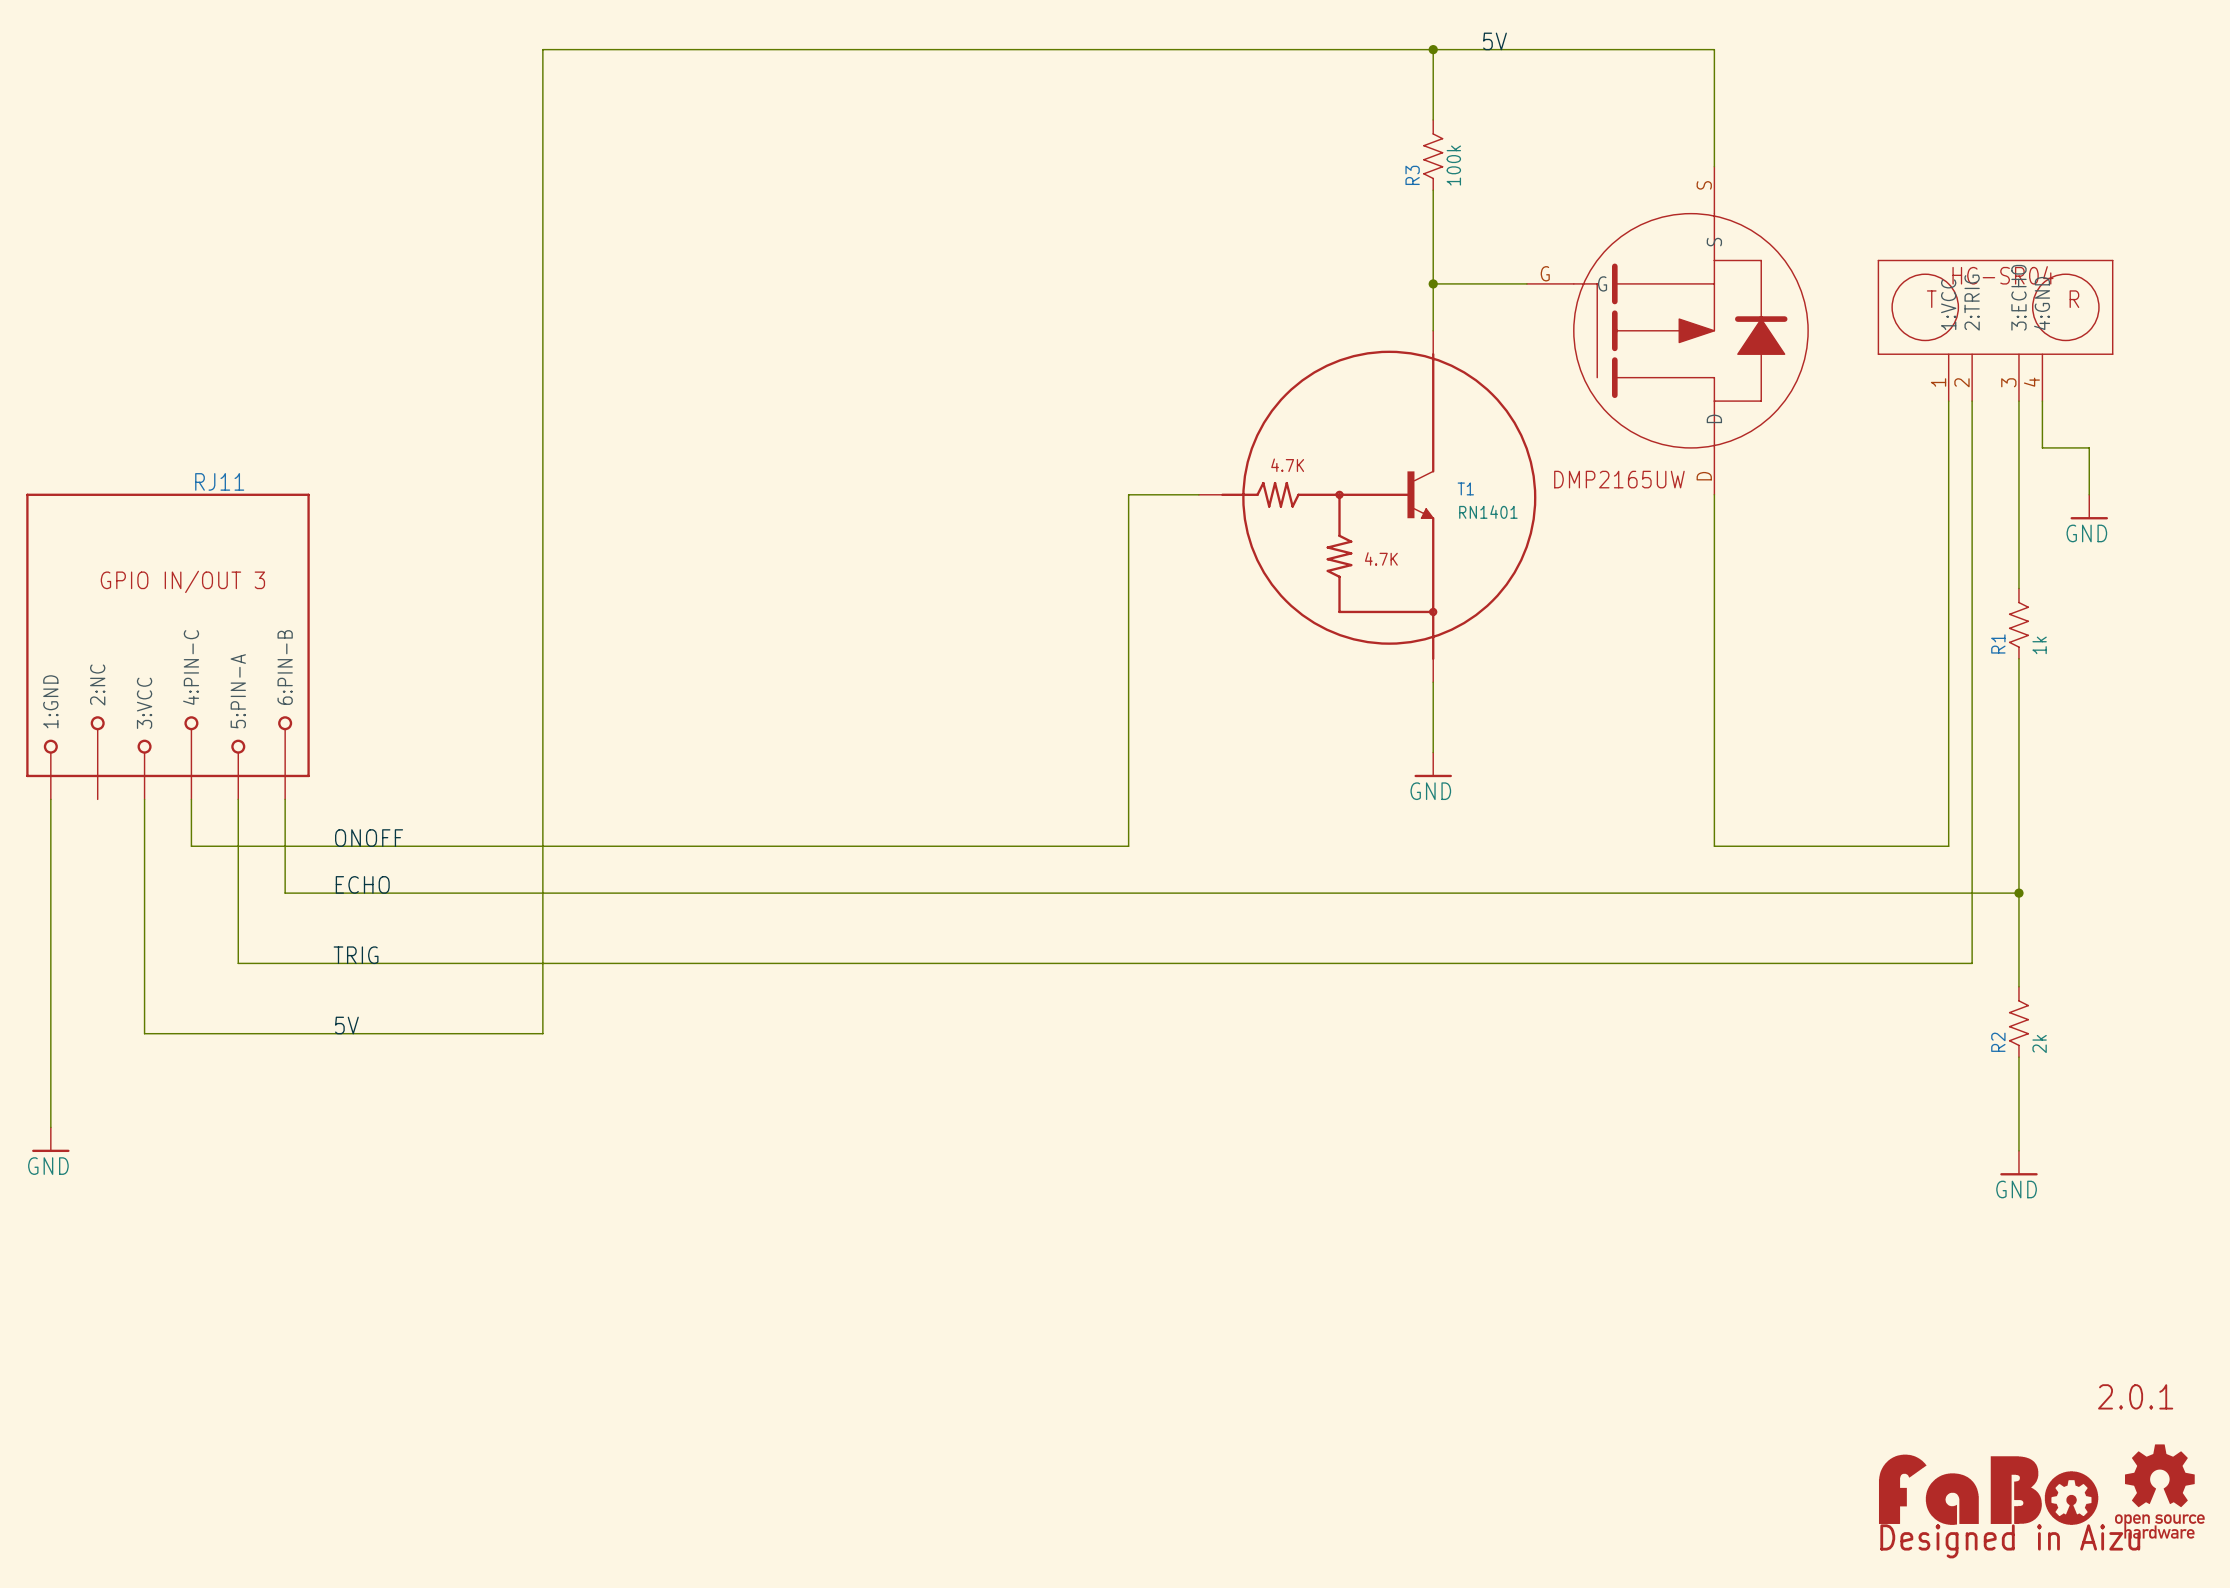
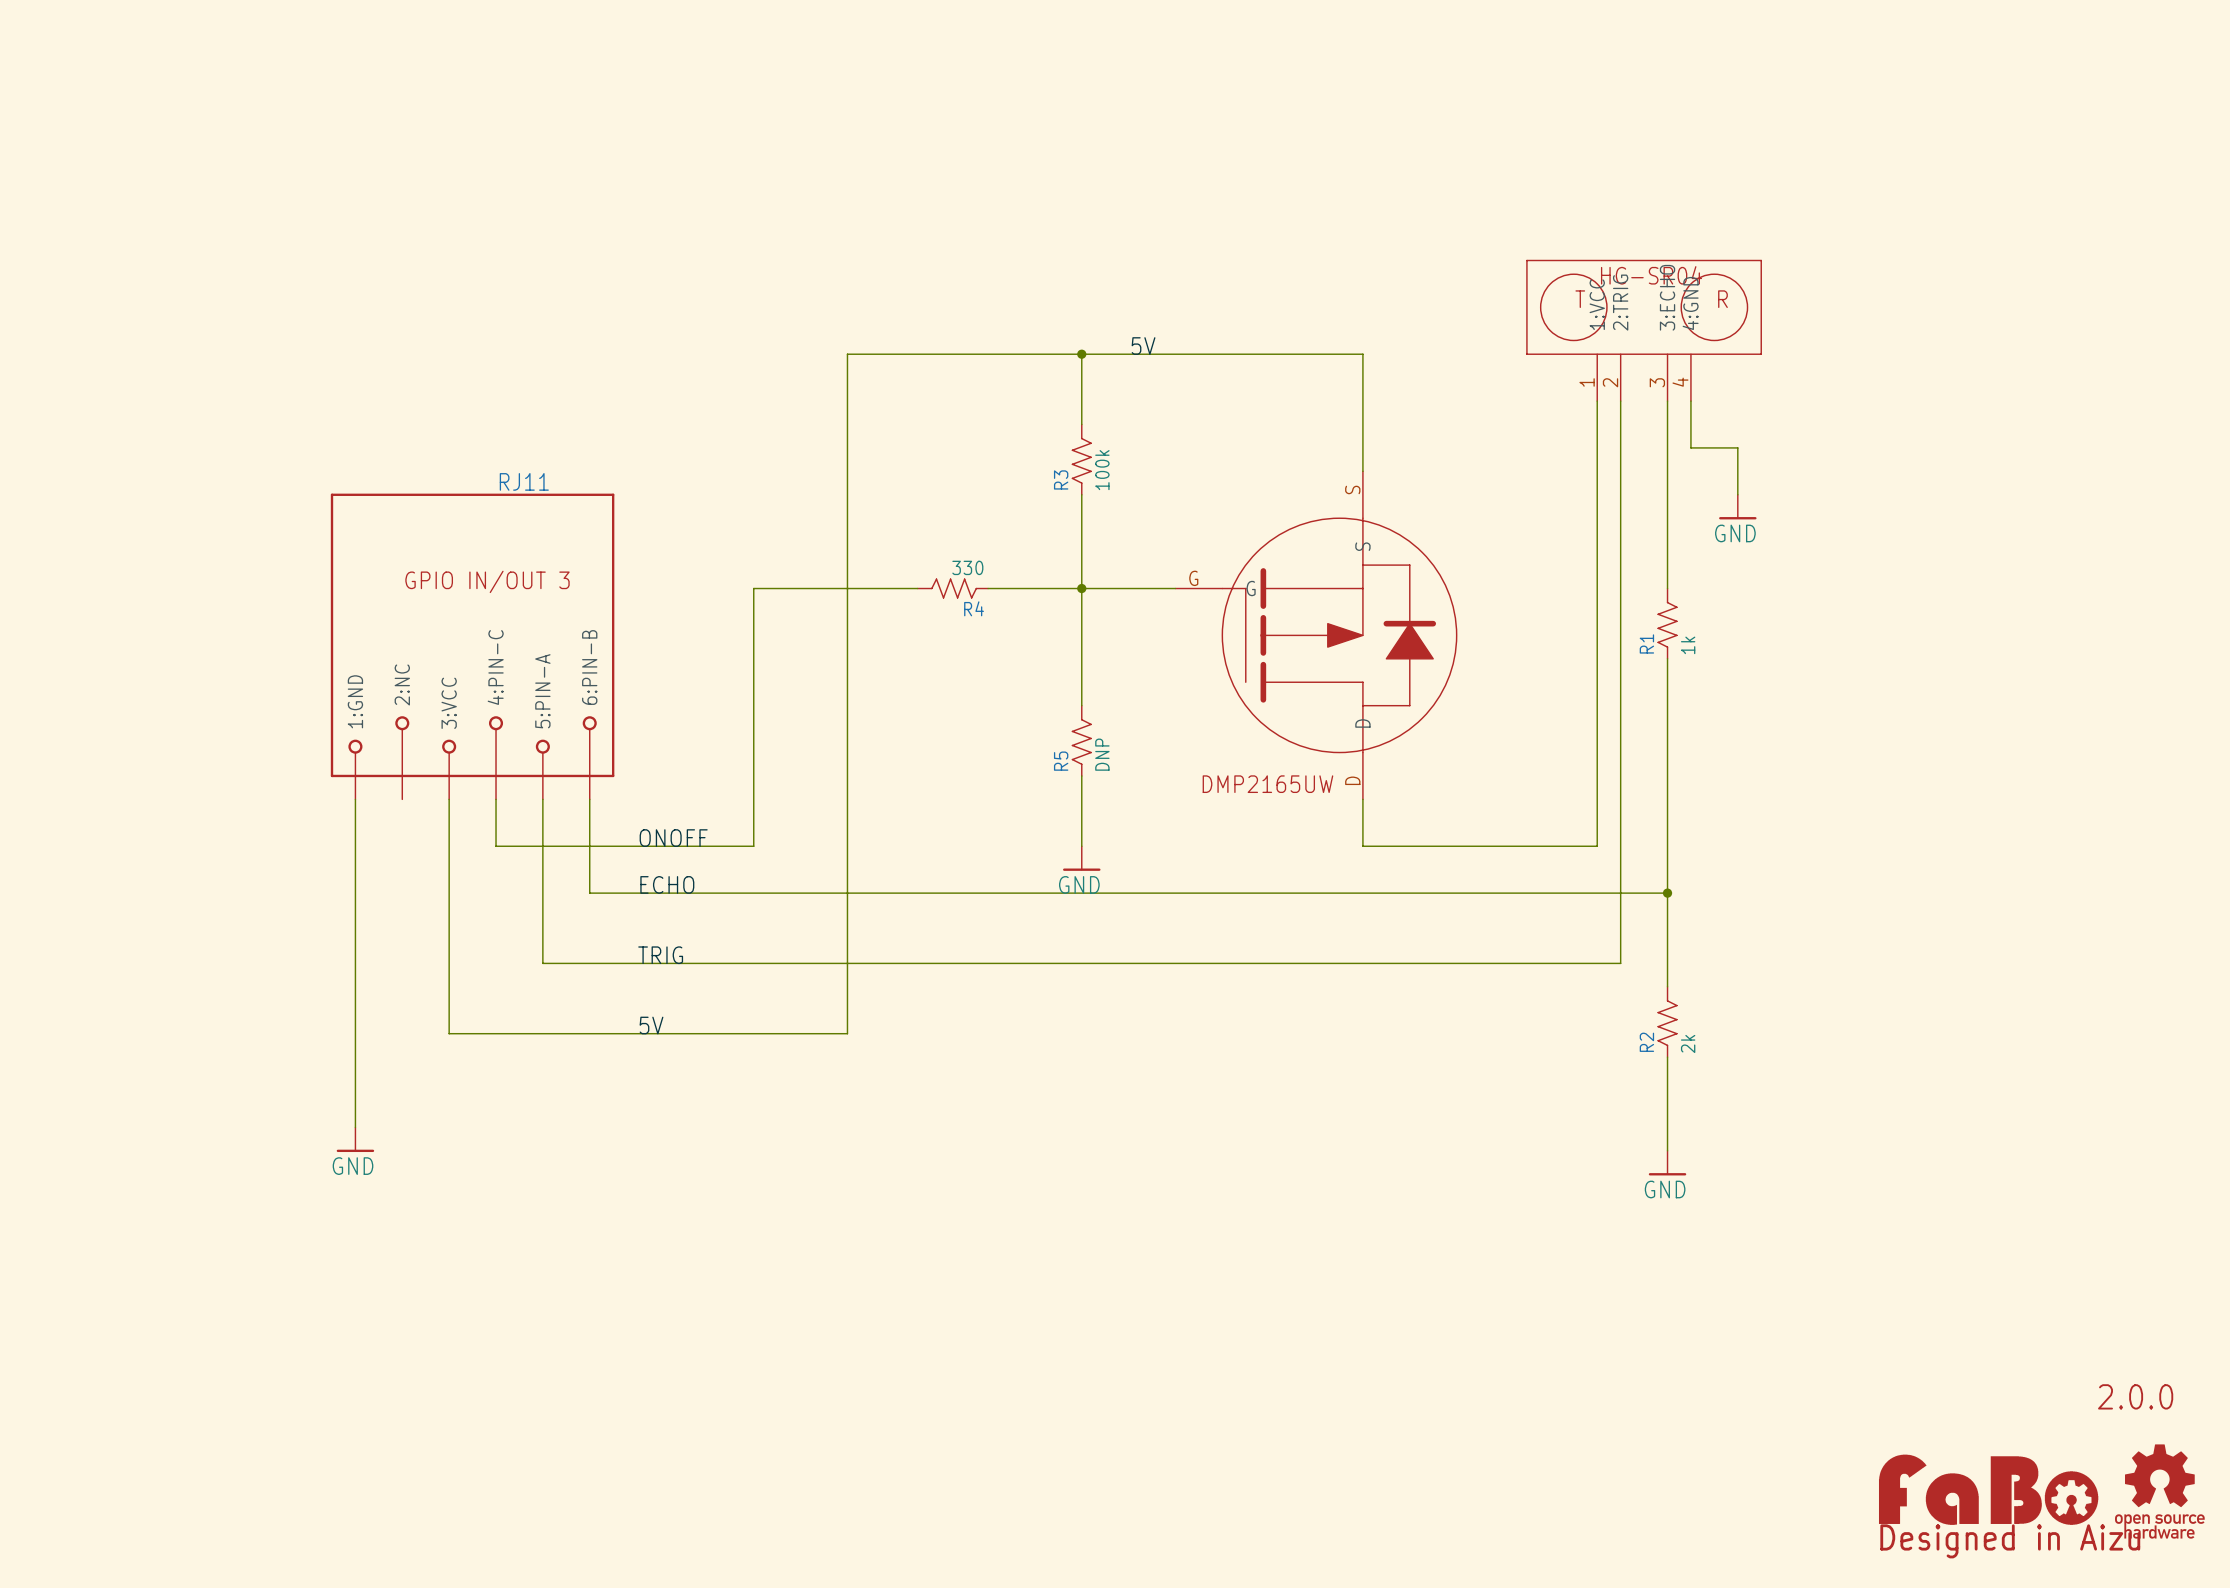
label: 5V (1495, 41) -> none
wire: (1433, 49) (1433, 119) -> none
junction: (1433, 49) -> none
R3 position: (1433, 155) -> (1081, 459)
wire: (1714, 166) (1714, 49) (542, 49) (542, 799) -> none
wire: (1433, 190) (1433, 330) -> none
wire: (1433, 283) (1526, 283) -> none
junction: (1433, 283) -> none
part: none -> (1644, 330)
part: (1667, 330) -> none
part: (1995, 330) -> none
label: none -> 5V (1143, 346)
wire: none -> (1081, 354) (1081, 424)
junction: none -> (1081, 354)
wire: none -> (1597, 401) (1597, 846) (1362, 846) (1362, 799)
wire: none -> (1667, 401) (1667, 588)
wire: none -> (1690, 401) (1690, 447) (1737, 447) (1737, 494)
wire: (1948, 401) (1948, 846) (1714, 846) (1714, 494) -> none
wire: (1972, 401) (1972, 963) (1620, 963) -> (1620, 401) (1620, 963)
wire: (2018, 401) (2018, 588) -> none
wire: (2042, 401) (2042, 447) (2089, 447) (2089, 494) -> none
wire: none -> (1081, 494) (1081, 705)
wire: (1198, 494) (1128, 494) (1128, 846) (753, 846) -> (917, 588) (753, 588) (753, 846)
T1: RN1401 (1367, 506) -> none
power symbol: none -> GND (1737, 507)
power symbol: GND (2089, 507) -> none
R4: none -> 330 (952, 588)
wire: none -> (988, 588) (1175, 588)
junction: none -> (1081, 588)
R1 position: (2018, 623) -> (1667, 623)
part: none -> (1316, 635)
RJ11 position: (167, 646) -> (472, 646)
wire: none -> (1667, 658) (1667, 986)
wire: (2018, 658) (2018, 986) -> none
wire: (1433, 682) (1433, 752) -> none
R5: none -> DNP (1081, 740)
power symbol: GND (1433, 764) -> none
wire: none -> (1081, 775) (1081, 846)
wire: (50, 799) (50, 1127) -> none
wire: (144, 799) (144, 1033) (449, 1033) -> (449, 799) (449, 1033)
wire: (191, 799) (191, 846) (496, 846) -> (496, 799) (496, 846)
wire: (238, 799) (238, 963) (542, 963) (542, 1033) -> (1362, 471) (1362, 354) (847, 354) (847, 1033) (542, 1033)
wire: (285, 799) (285, 893) (589, 893) -> (589, 799) (589, 893)
wire: none -> (355, 799) (355, 1127)
label: ONOFF (369, 838) -> none
label: none -> ONOFF (673, 838)
power symbol: none -> GND (1081, 858)
label: ECHO (362, 884) -> none
label: none -> ECHO (667, 884)
wire: (1667, 893) (2018, 893) -> none
junction: none -> (1667, 893)
junction: (2018, 893) -> none
label: TRIG (356, 955) -> none
label: none -> TRIG (660, 955)
R2 position: (2018, 1021) -> (1667, 1021)
label: 5V (346, 1025) -> none
label: none -> 5V (651, 1025)
wire: none -> (1667, 1057) (1667, 1150)
wire: (2018, 1057) (2018, 1150) -> none
power symbol: GND (50, 1139) -> none
power symbol: none -> GND (355, 1139)
power symbol: none -> GND (1667, 1163)
power symbol: GND (2018, 1163) -> none
text: 2.0.1 (2135, 1396) -> 2.0.0 (2135, 1396)

